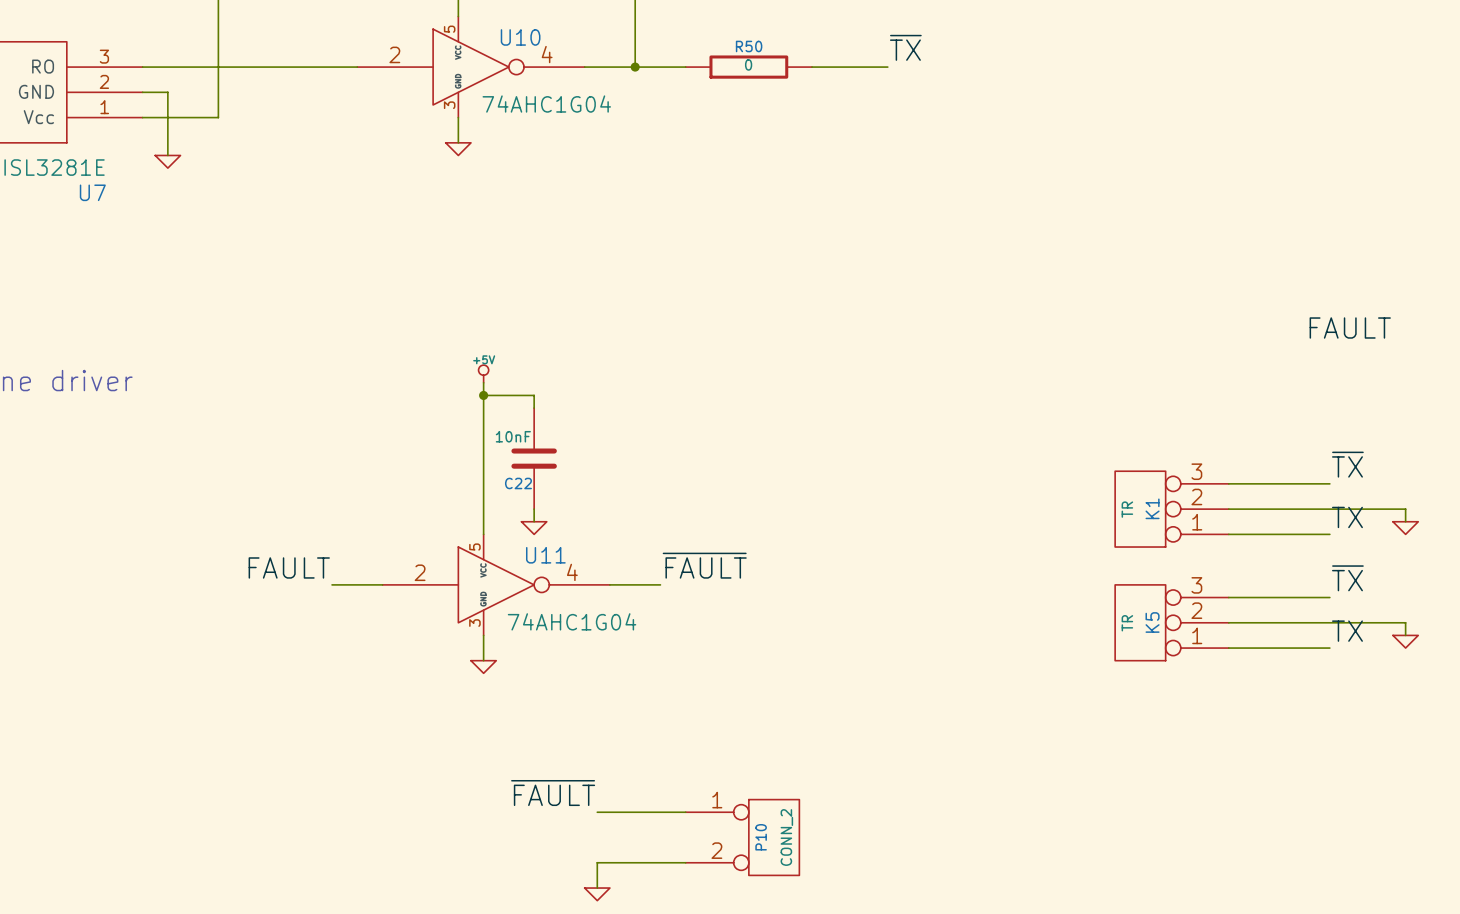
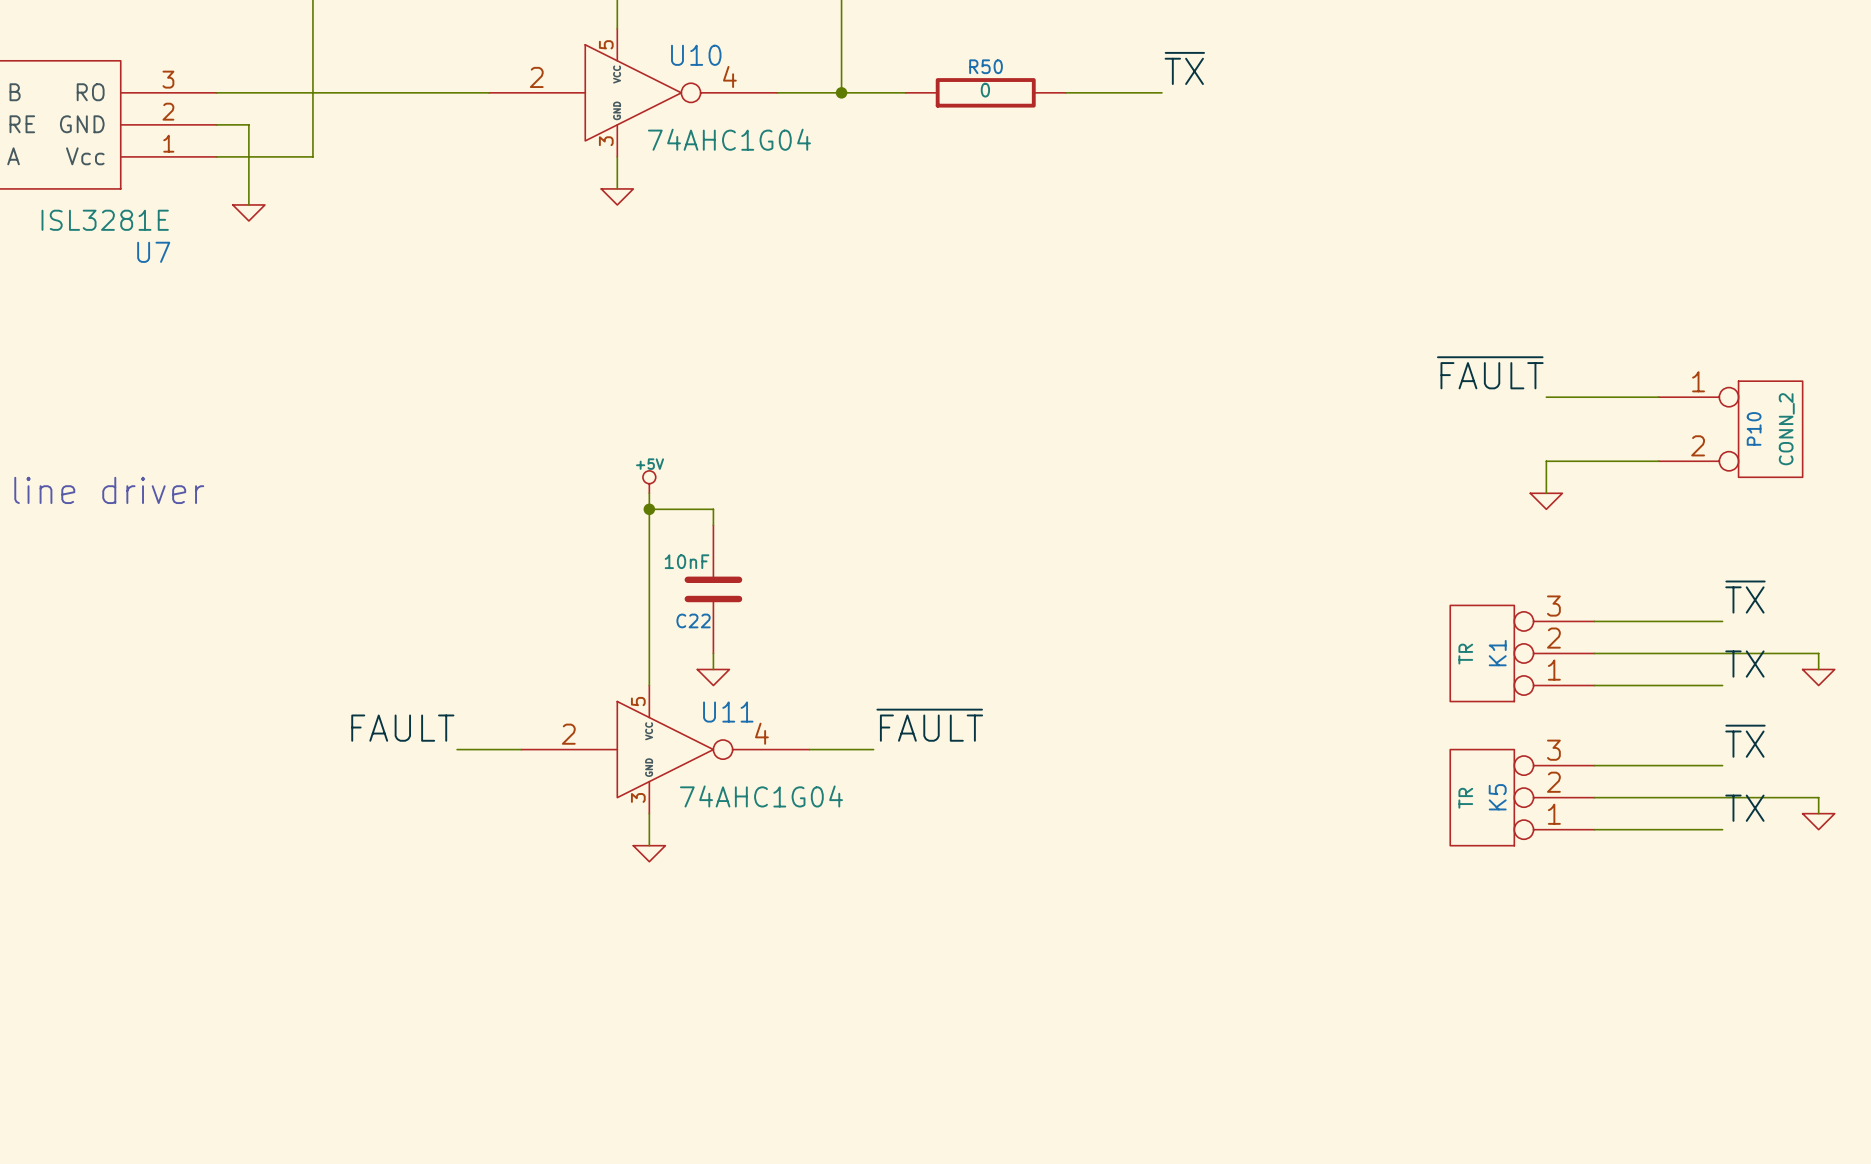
label: none -> ~{FAULT} (1490, 372)
wire: none -> (1546, 397) (1658, 397)
label: FAULT (1350, 328) -> none
wire: none -> (1658, 461) (1546, 461) (1546, 493)
power symbol: none -> (1546, 501)
label: ~{FAULT} (553, 793) -> none
wire: (597, 812) (685, 812) -> none
P10 position: (742, 837) -> (1730, 429)
wire: (685, 862) (597, 862) (597, 888) -> none
power symbol: (597, 894) -> none

